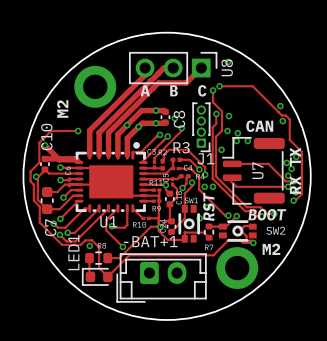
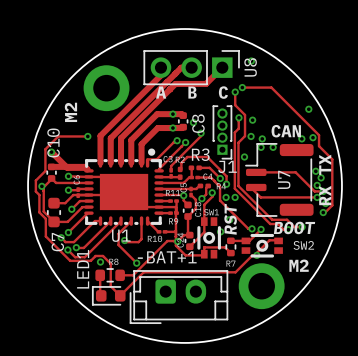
track: (246, 86) (252, 86) (278, 112) -> (271, 87) (319, 135)
track: (278, 112) (289, 119) (289, 129) -> none
via: (282, 121) -> none
via: (127, 125) -> none
via: (138, 126) -> none
via: none -> (312, 137)
via: none -> (301, 138)
via: (296, 156) -> none
track: (240, 229) (246, 236) (246, 240) (253, 242) (243, 242) (240, 239) (232, 239) -> (265, 244) (256, 255)
via position: (253, 242) -> (256, 255)

